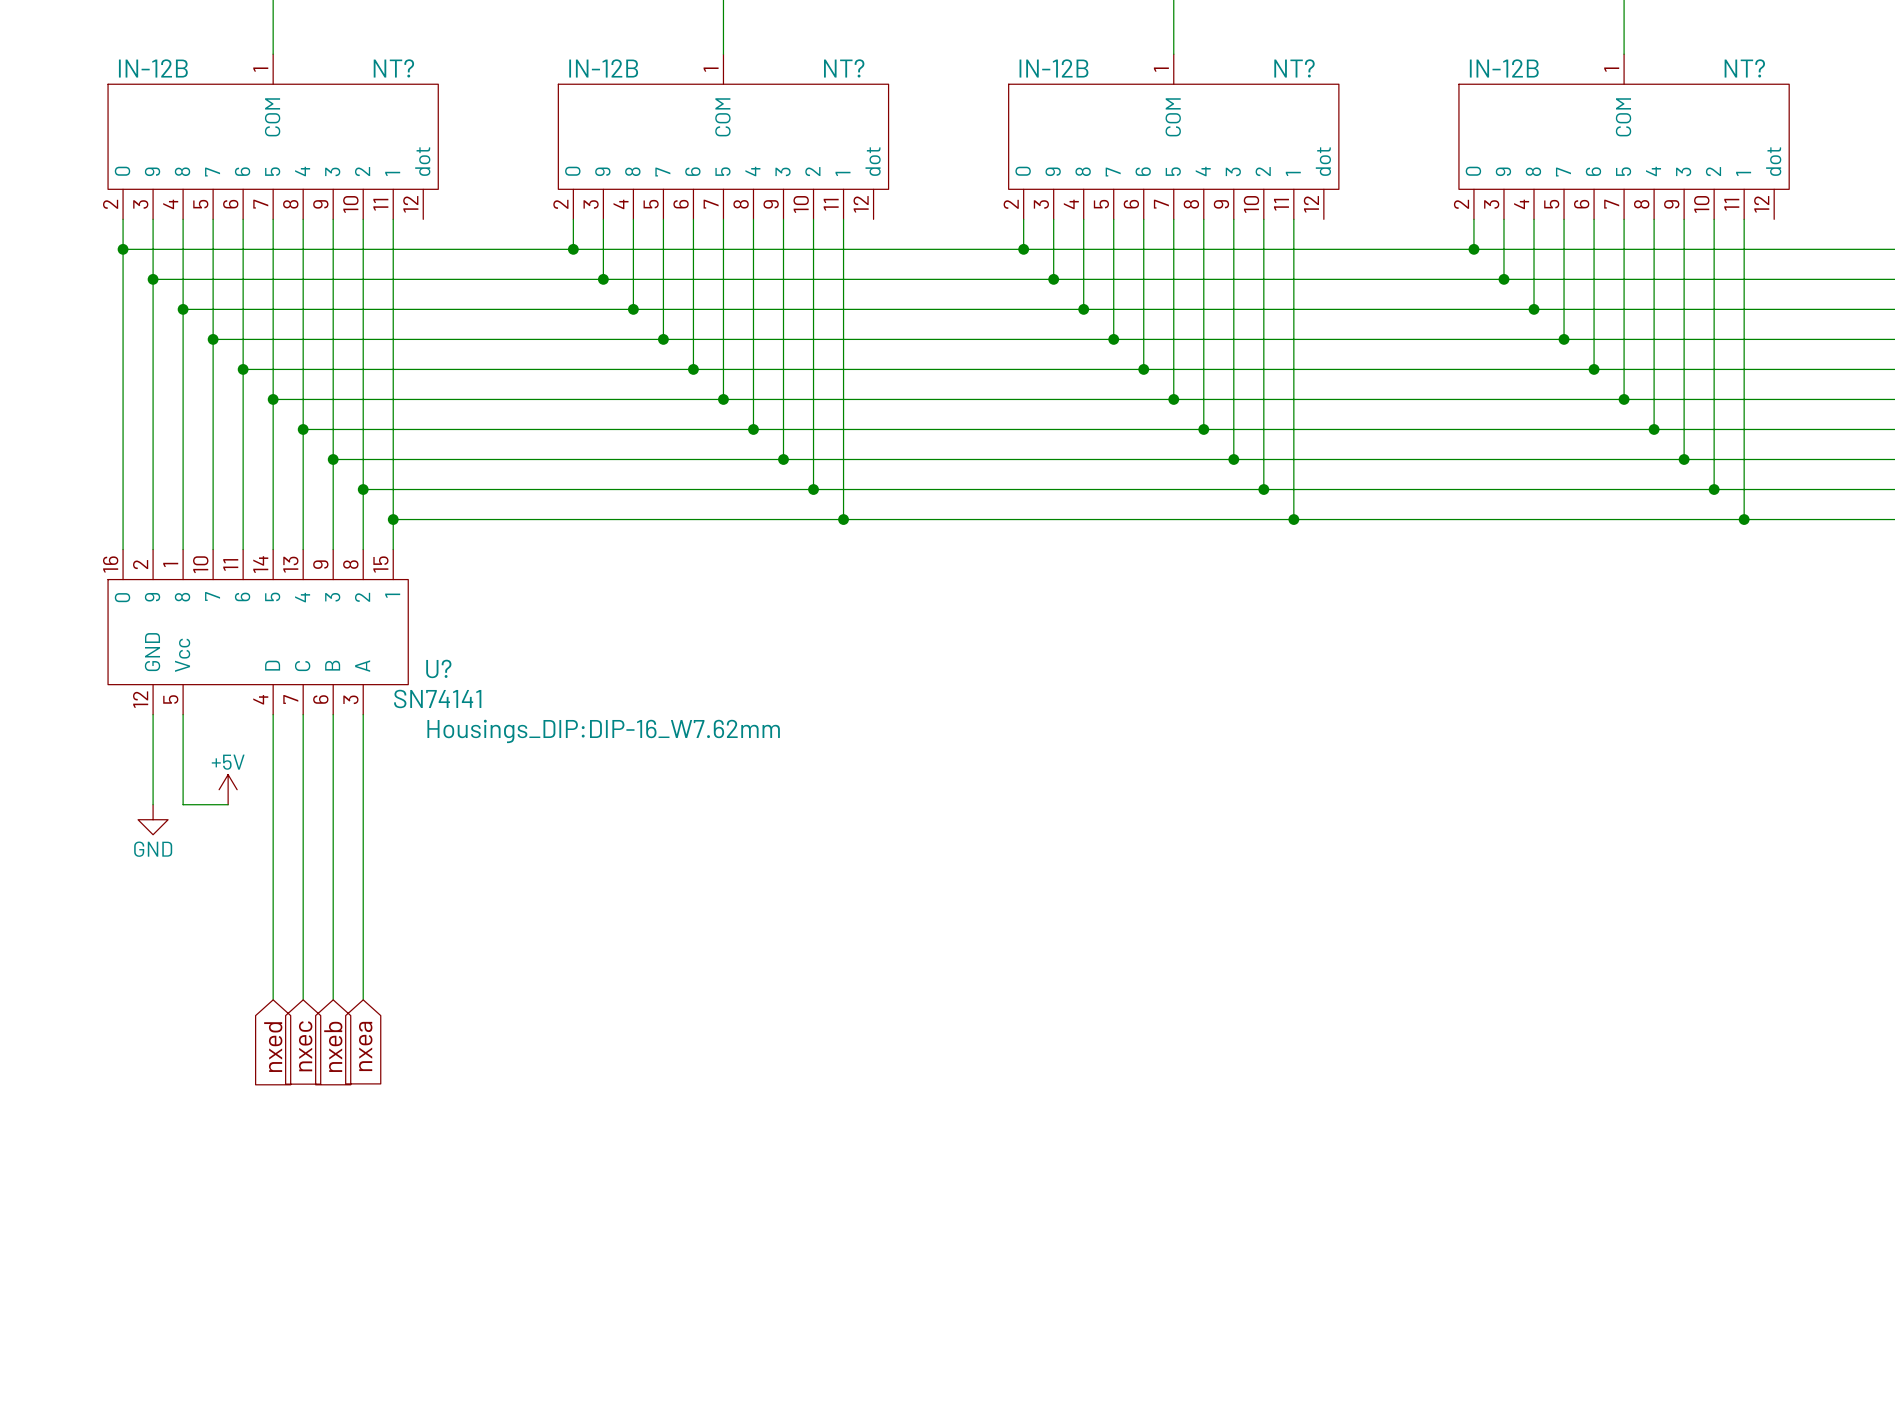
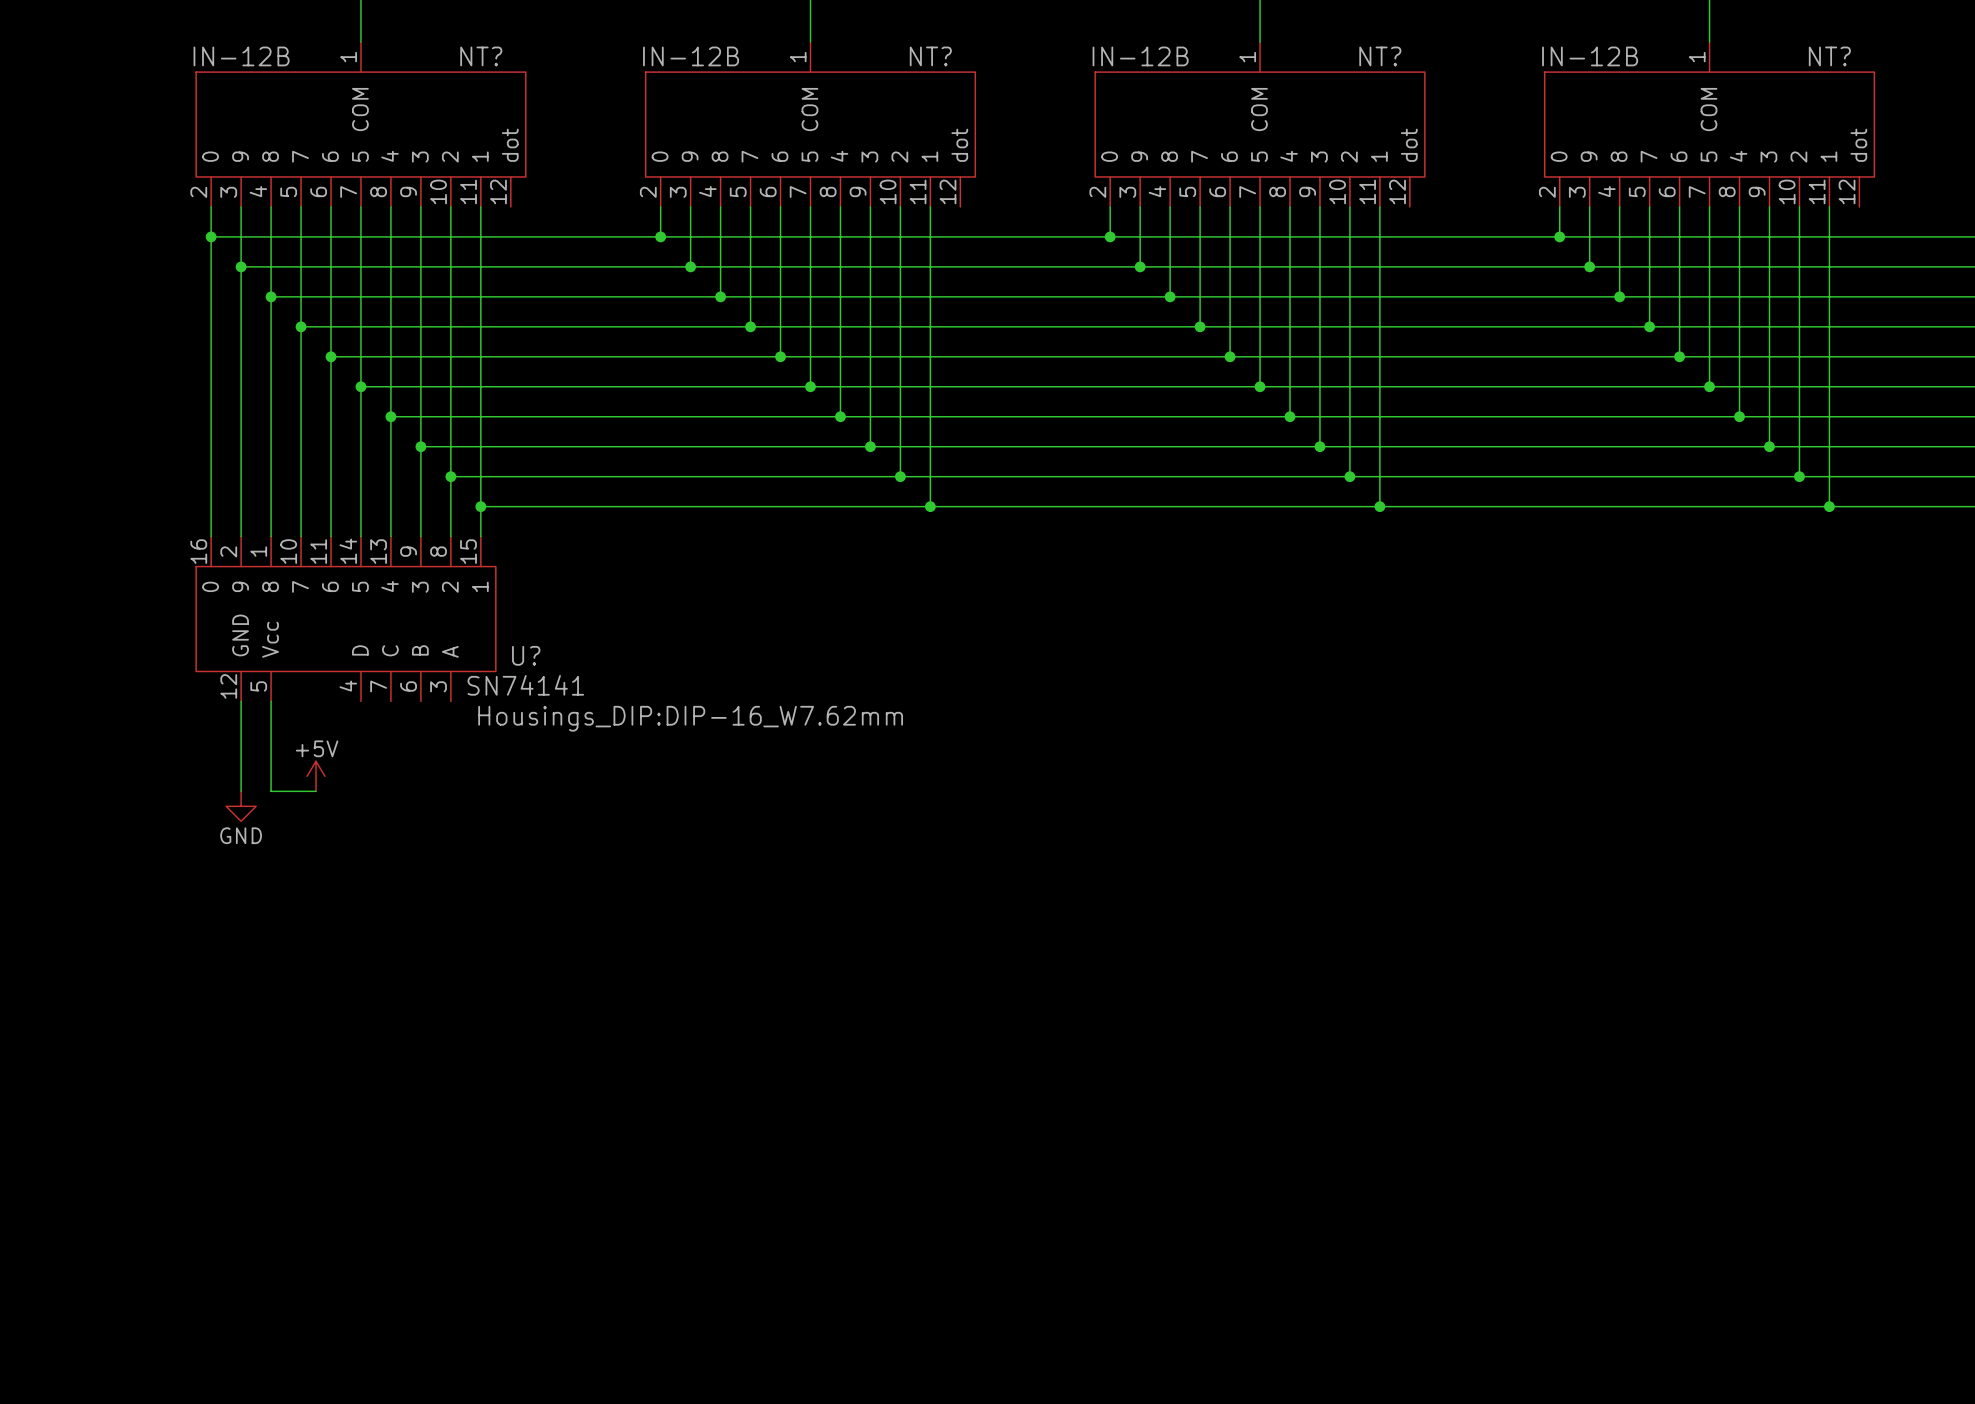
wire: (273, 714) (273, 999) -> none
wire: (303, 714) (303, 999) -> none
wire: (333, 714) (333, 999) -> none
wire: (363, 714) (363, 999) -> none
global label: nxec (305, 1046) -> none
global label: nxeb (333, 1046) -> none
global label: nxea (365, 1046) -> none
global label: nxed (273, 1047) -> none

